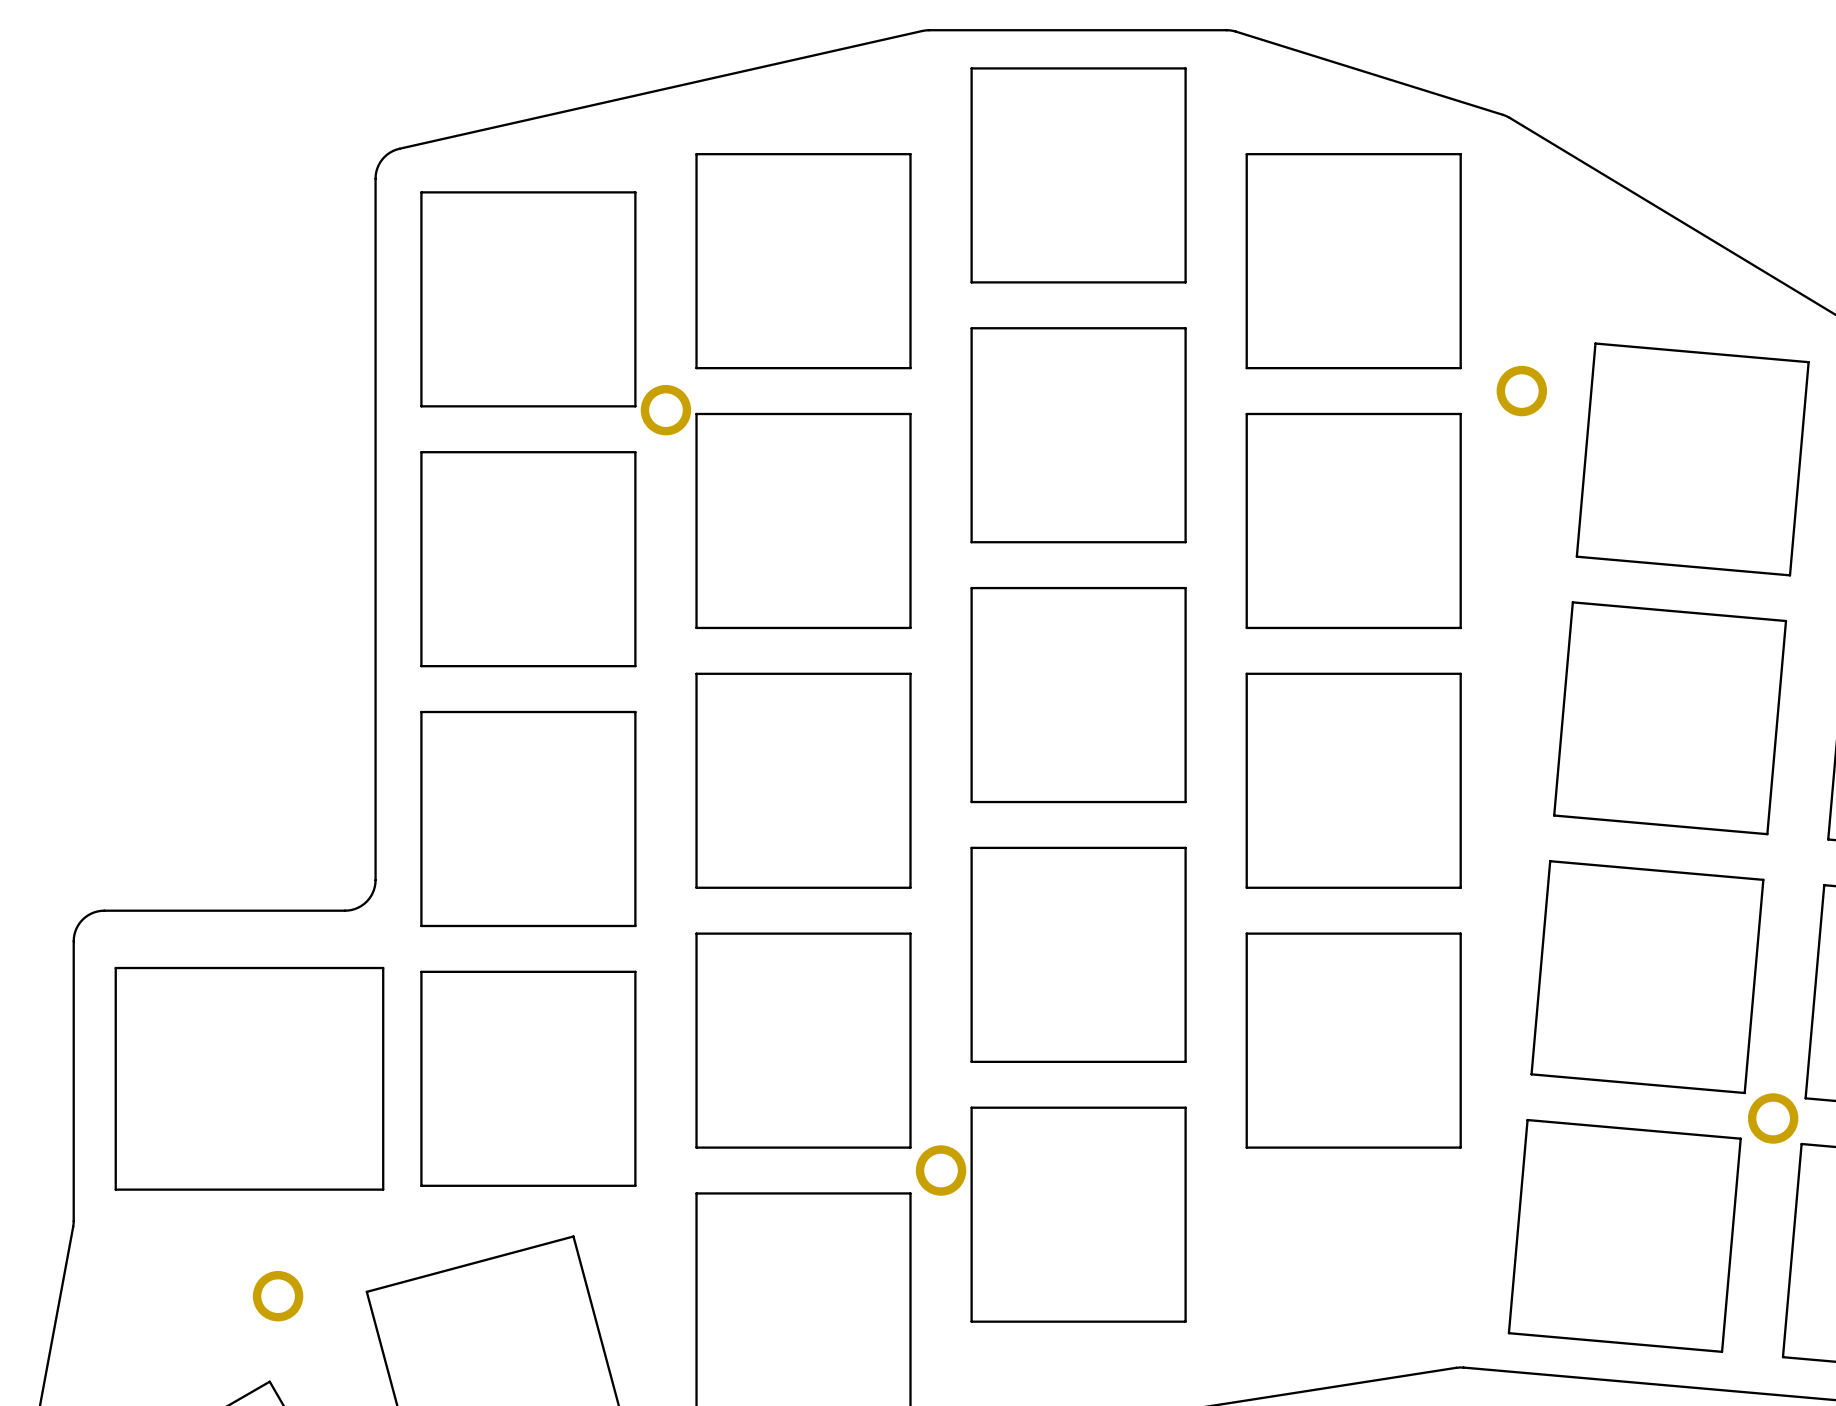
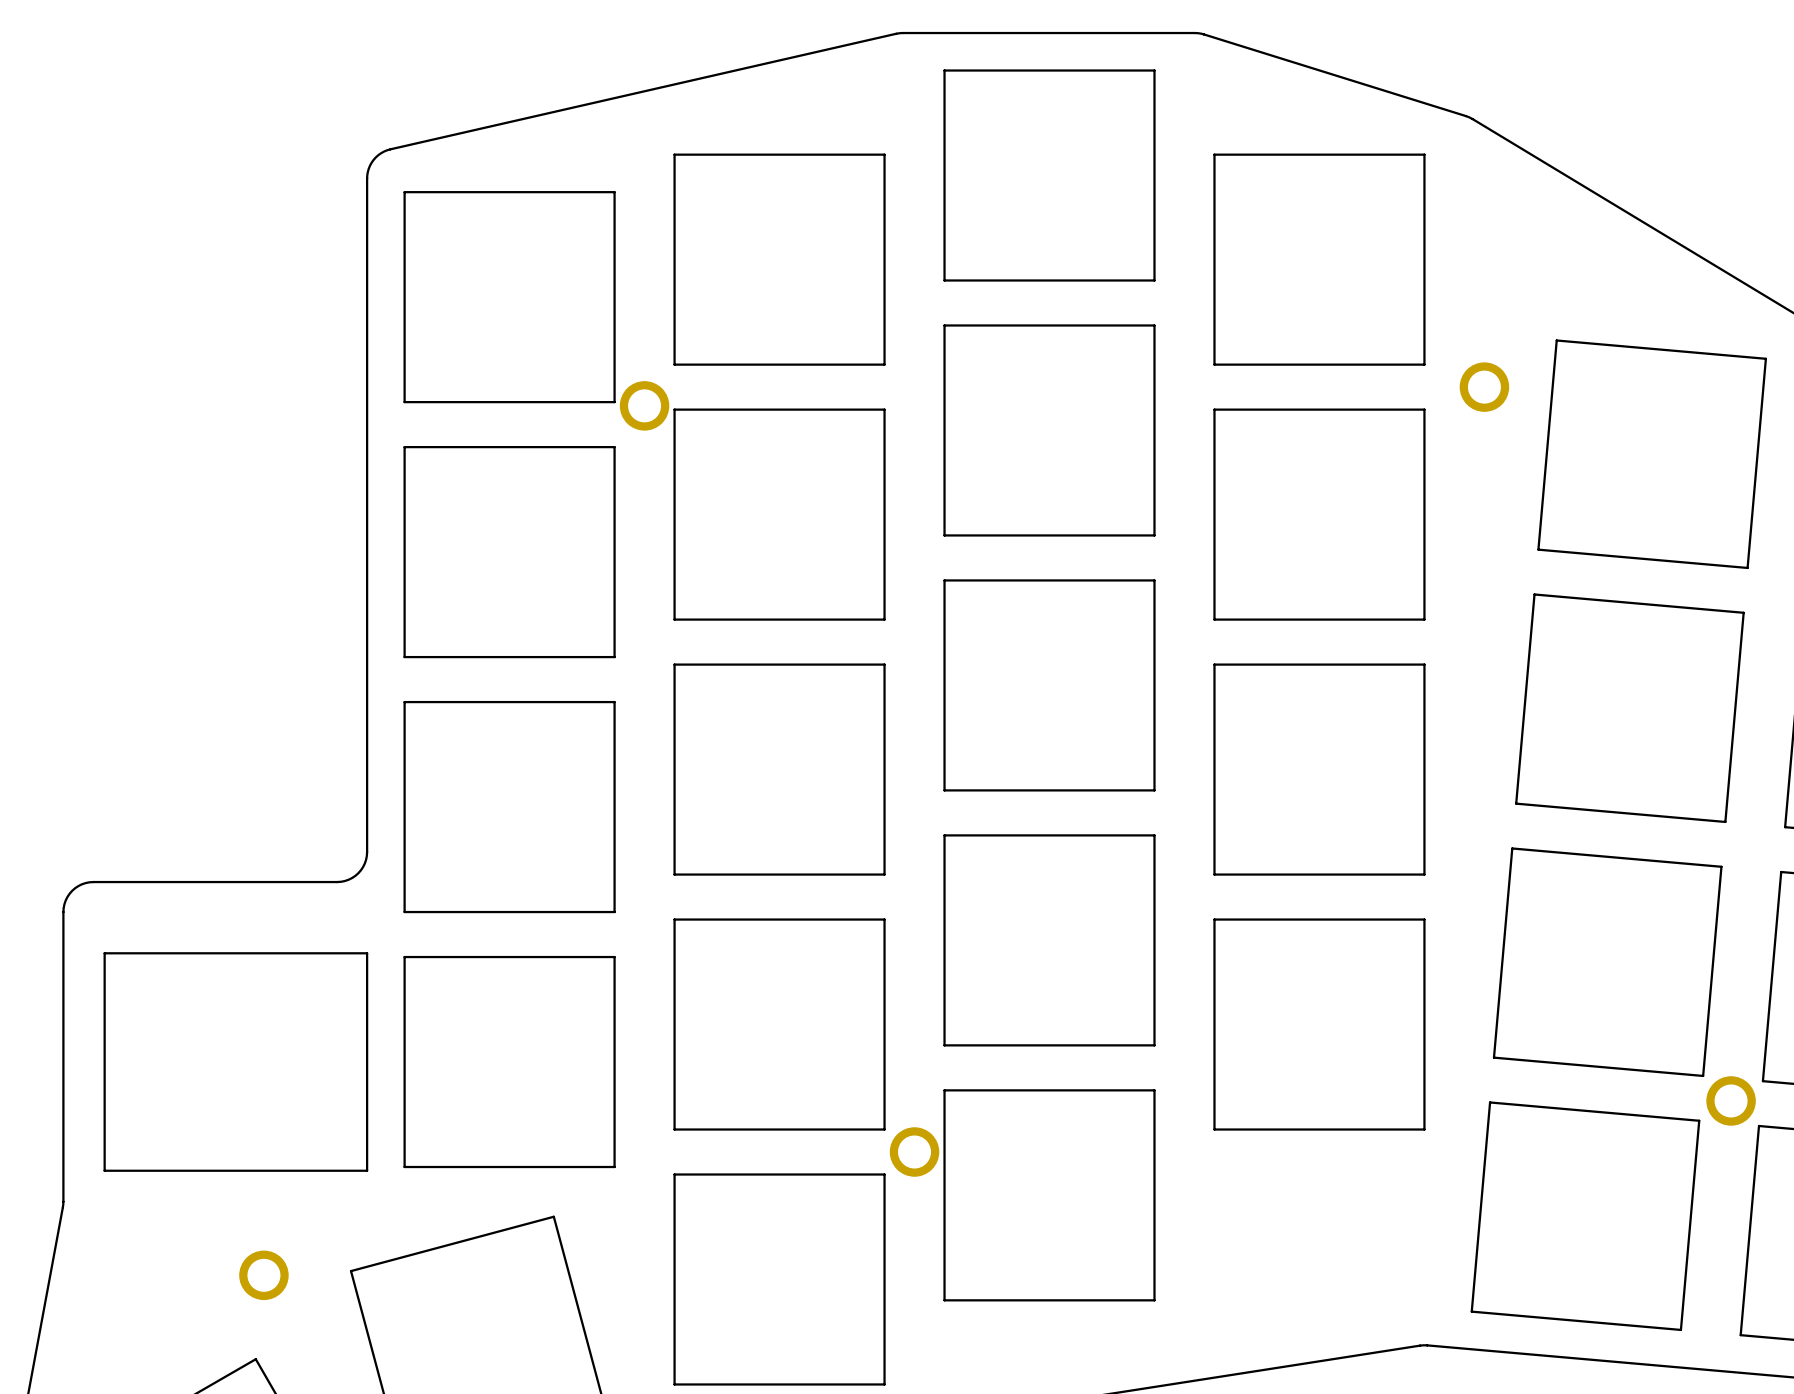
board edge: (922, 30) (399, 148) (384, 156) (377, 168) (375, 178) (375, 880) (373, 890) (364, 904) (348, 910) (97, 911) (88, 915) (80, 922) (75, 931) (73, 941) -> (896, 33) (390, 149) (375, 157) (368, 168) (367, 178) (367, 852) (364, 863) (355, 875) (341, 881) (85, 883) (75, 888) (67, 897) (63, 908) (63, 927)

